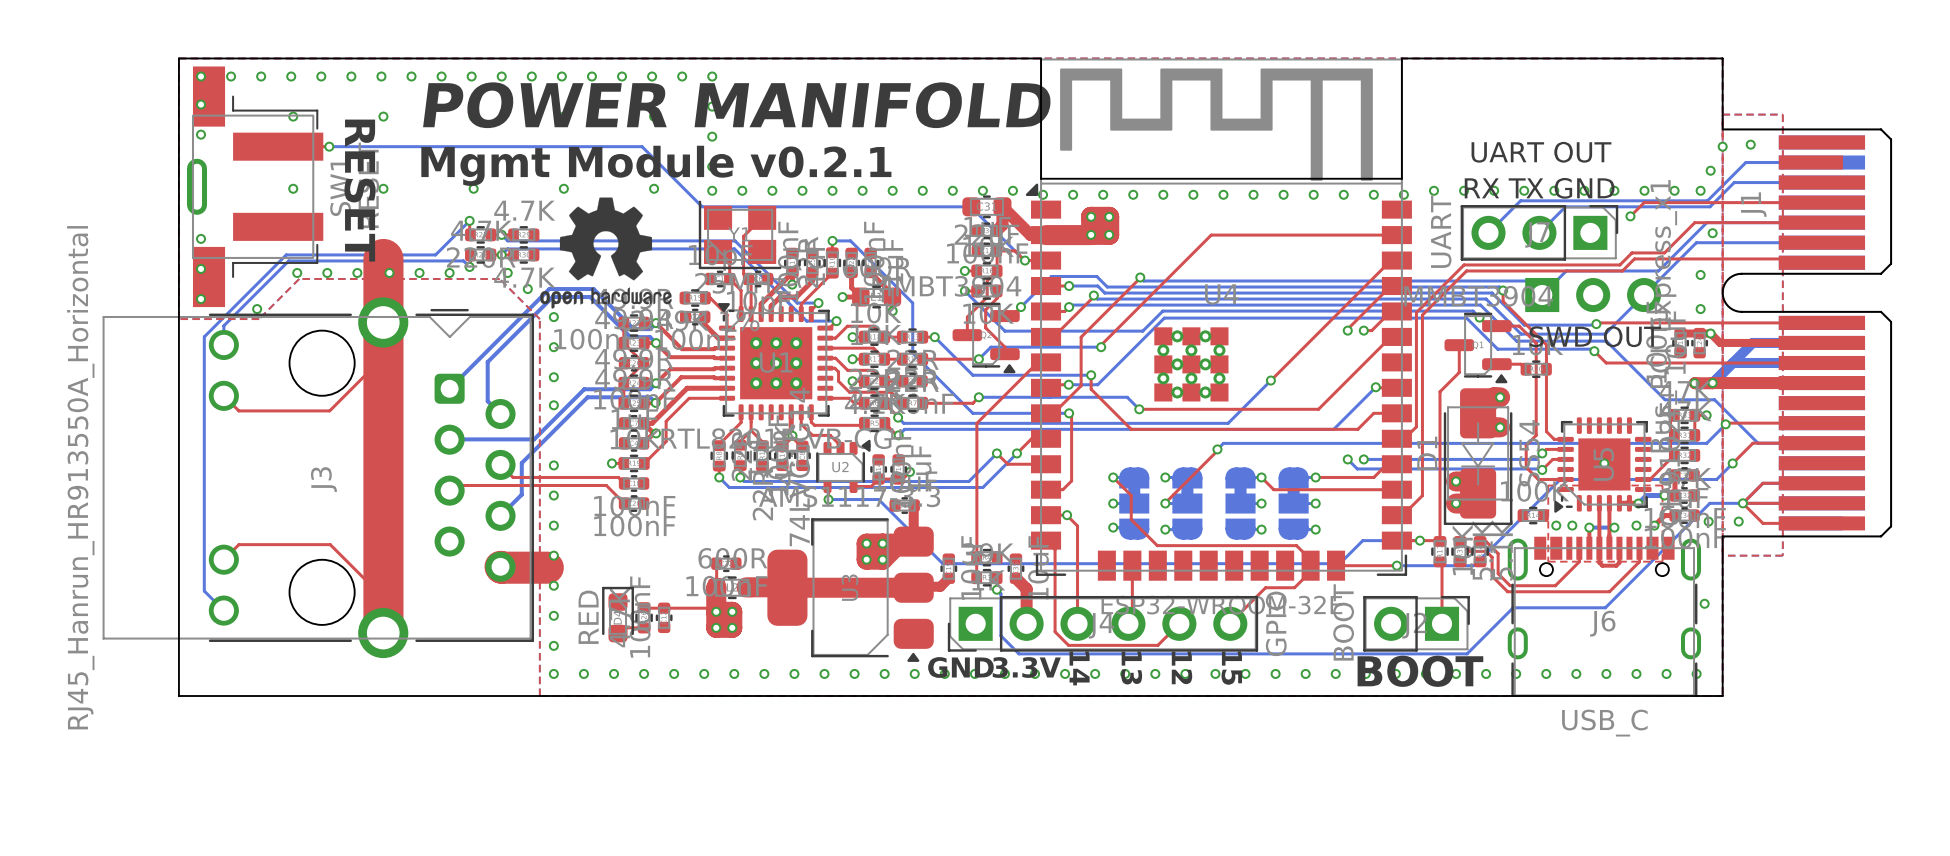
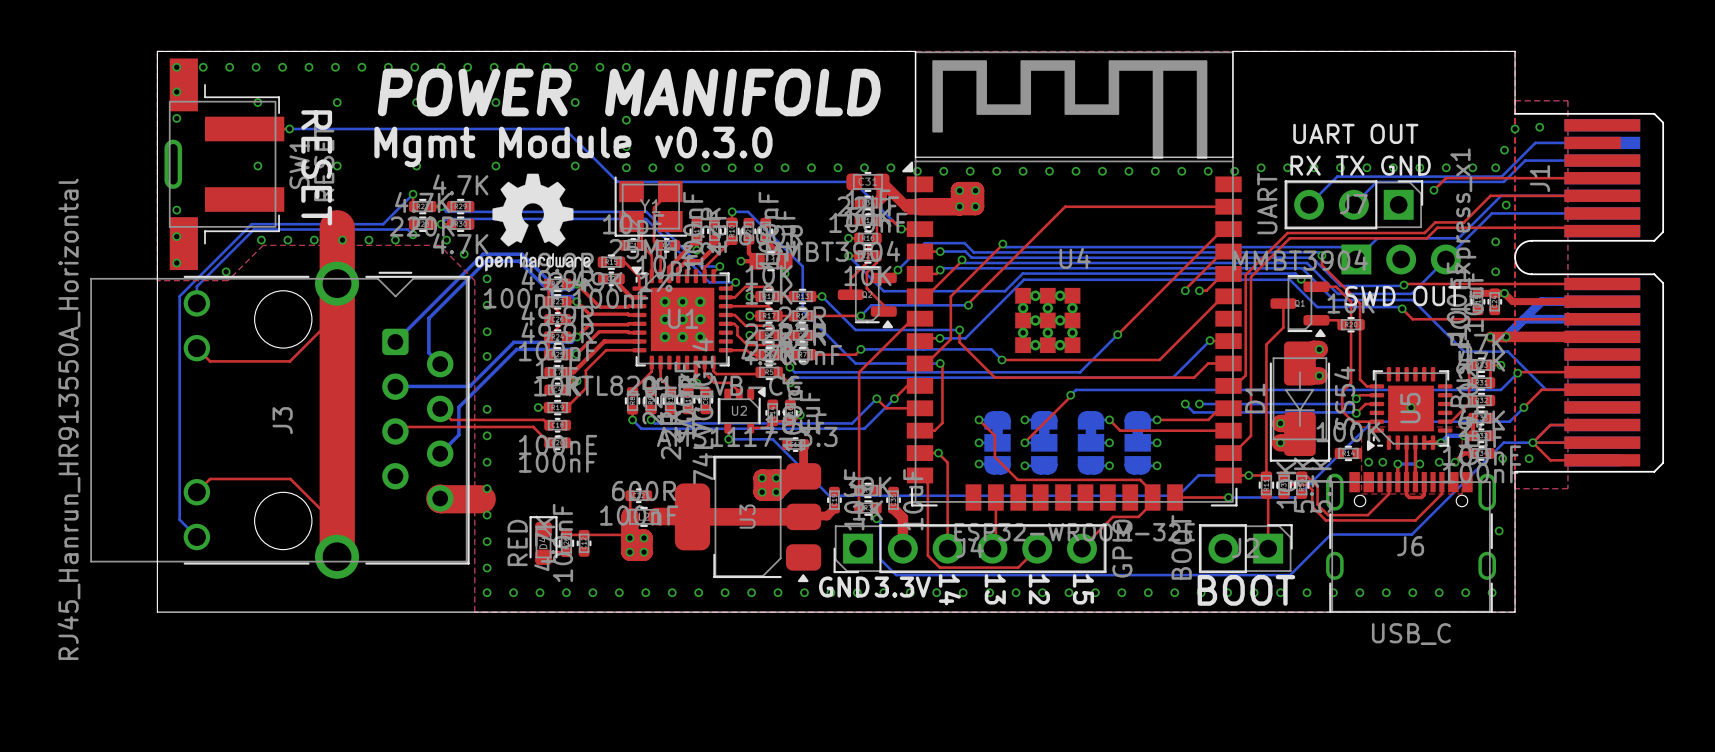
text: Mgmt Module v0.2.1 (656, 165) -> Mgmt Module v0.3.0 (573, 146)

